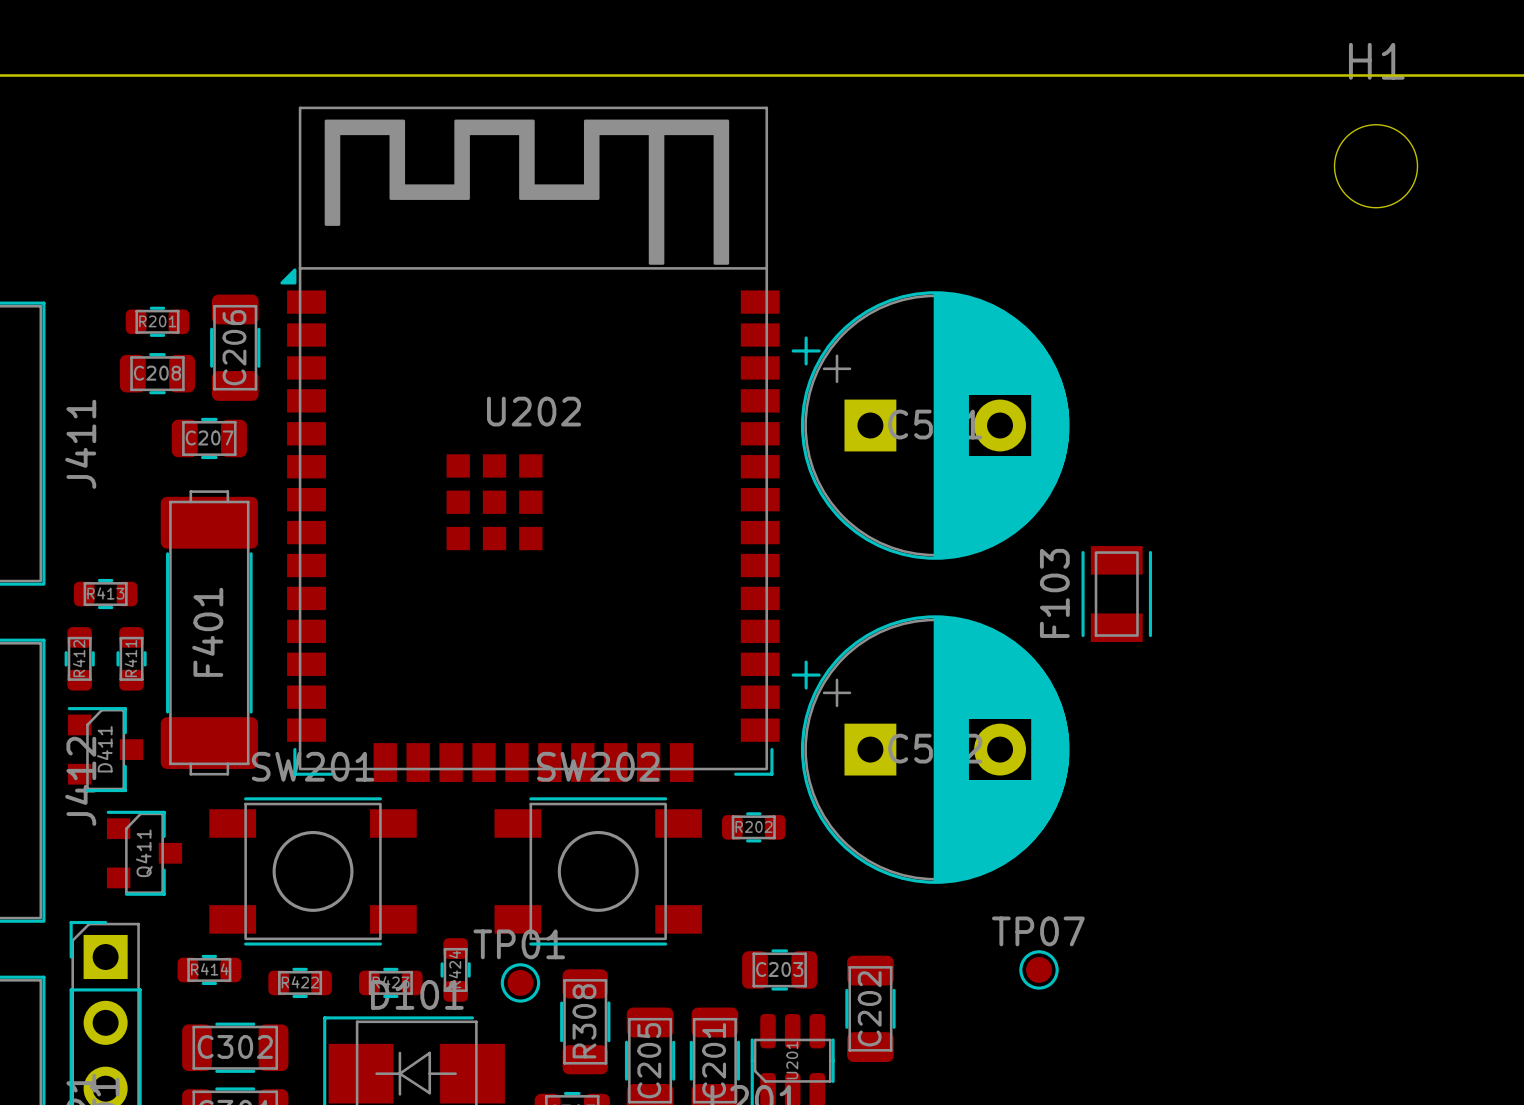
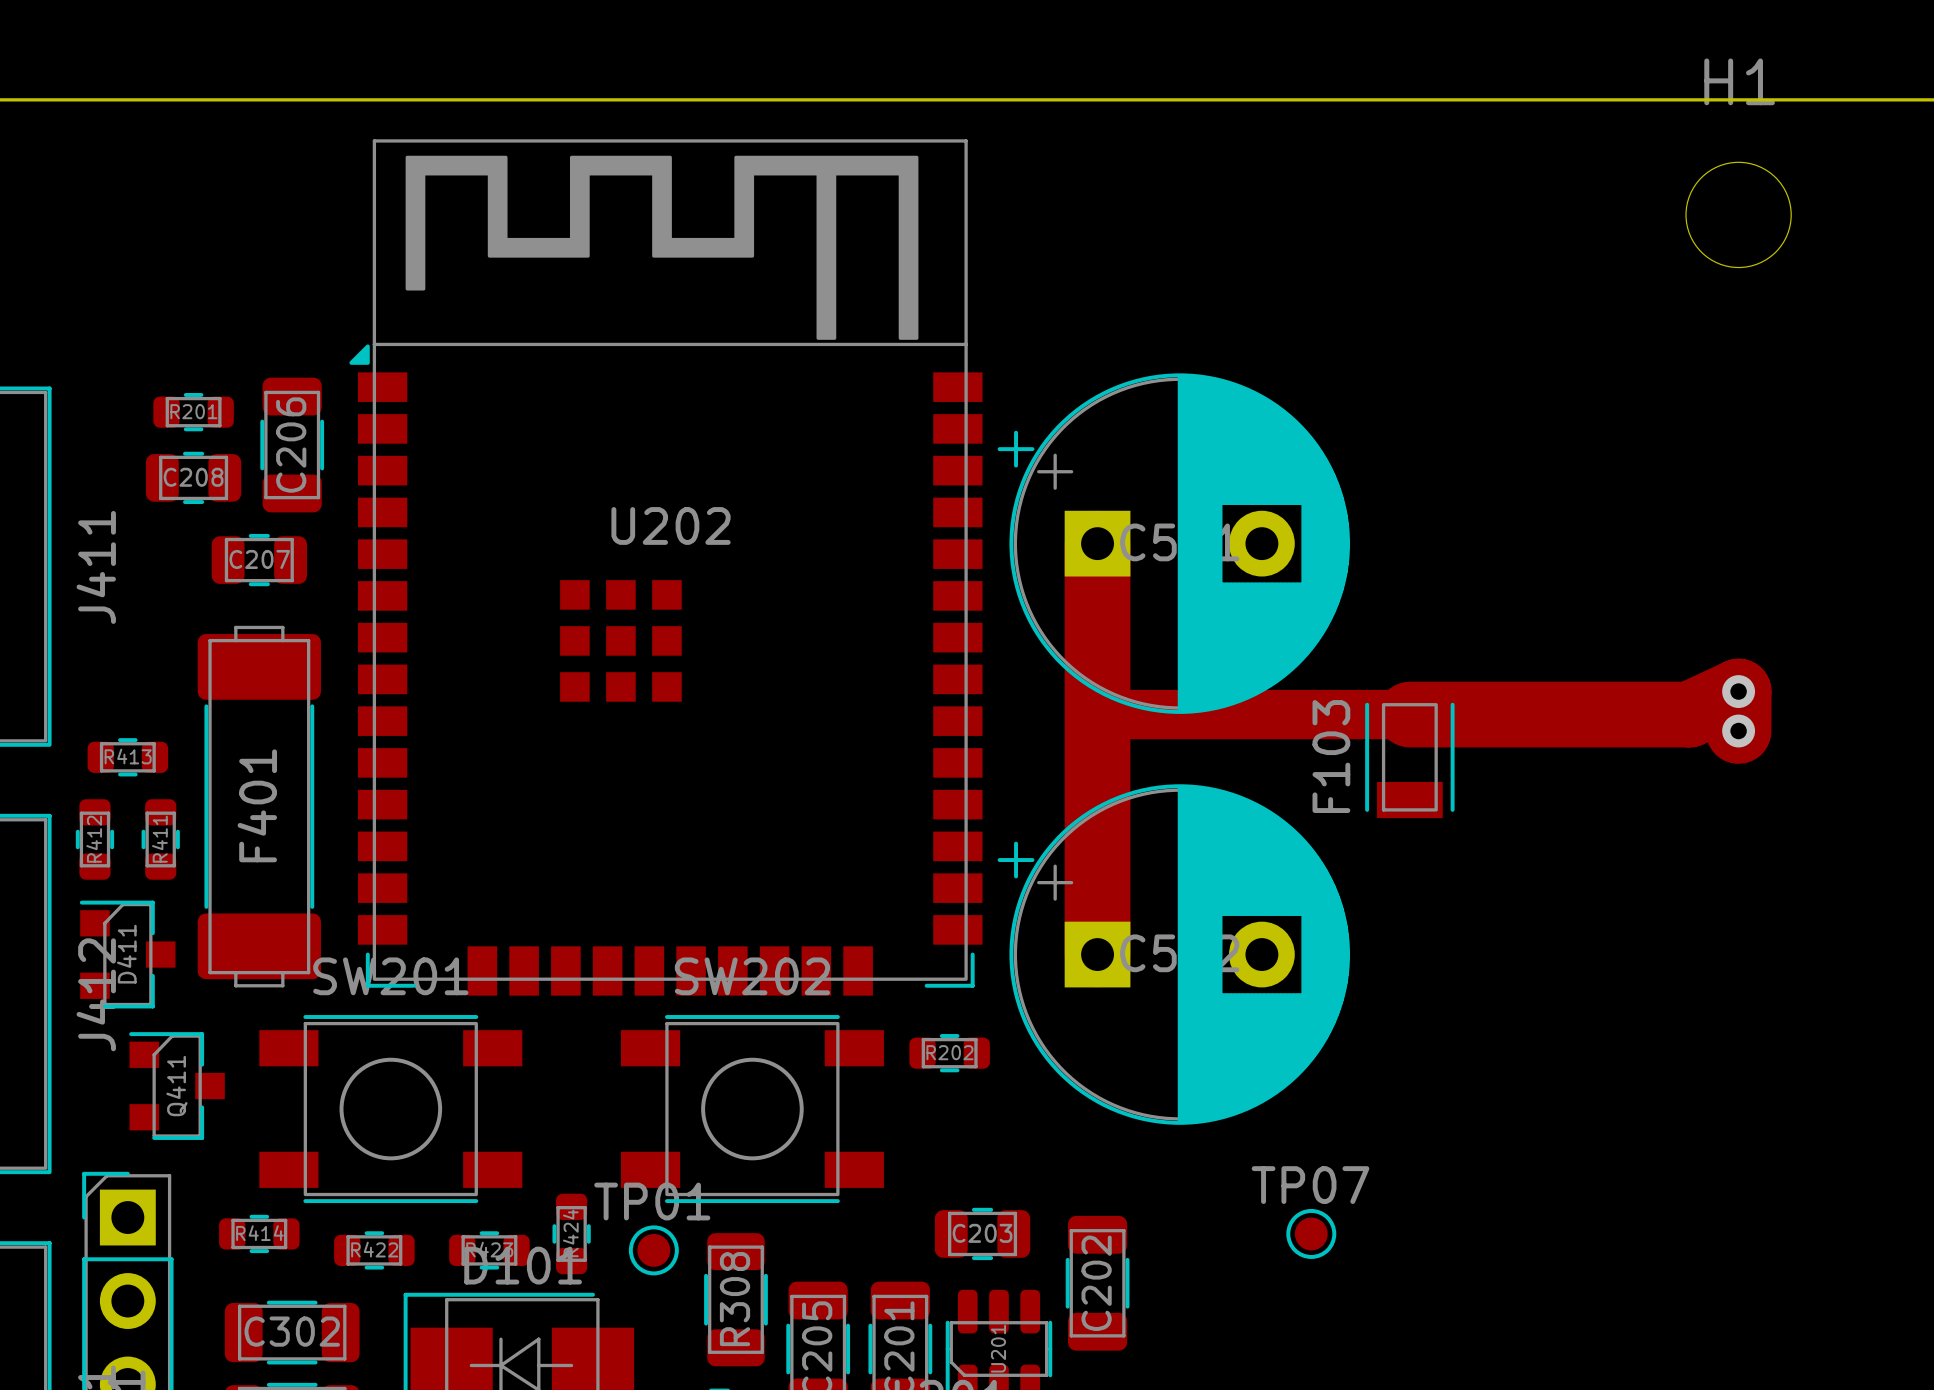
track: none -> (1097, 543) (1097, 954)
via: none -> (1738, 691)
track: none -> (1097, 714) (1689, 714) (1738, 691) (1738, 731)
via: none -> (1738, 731)

